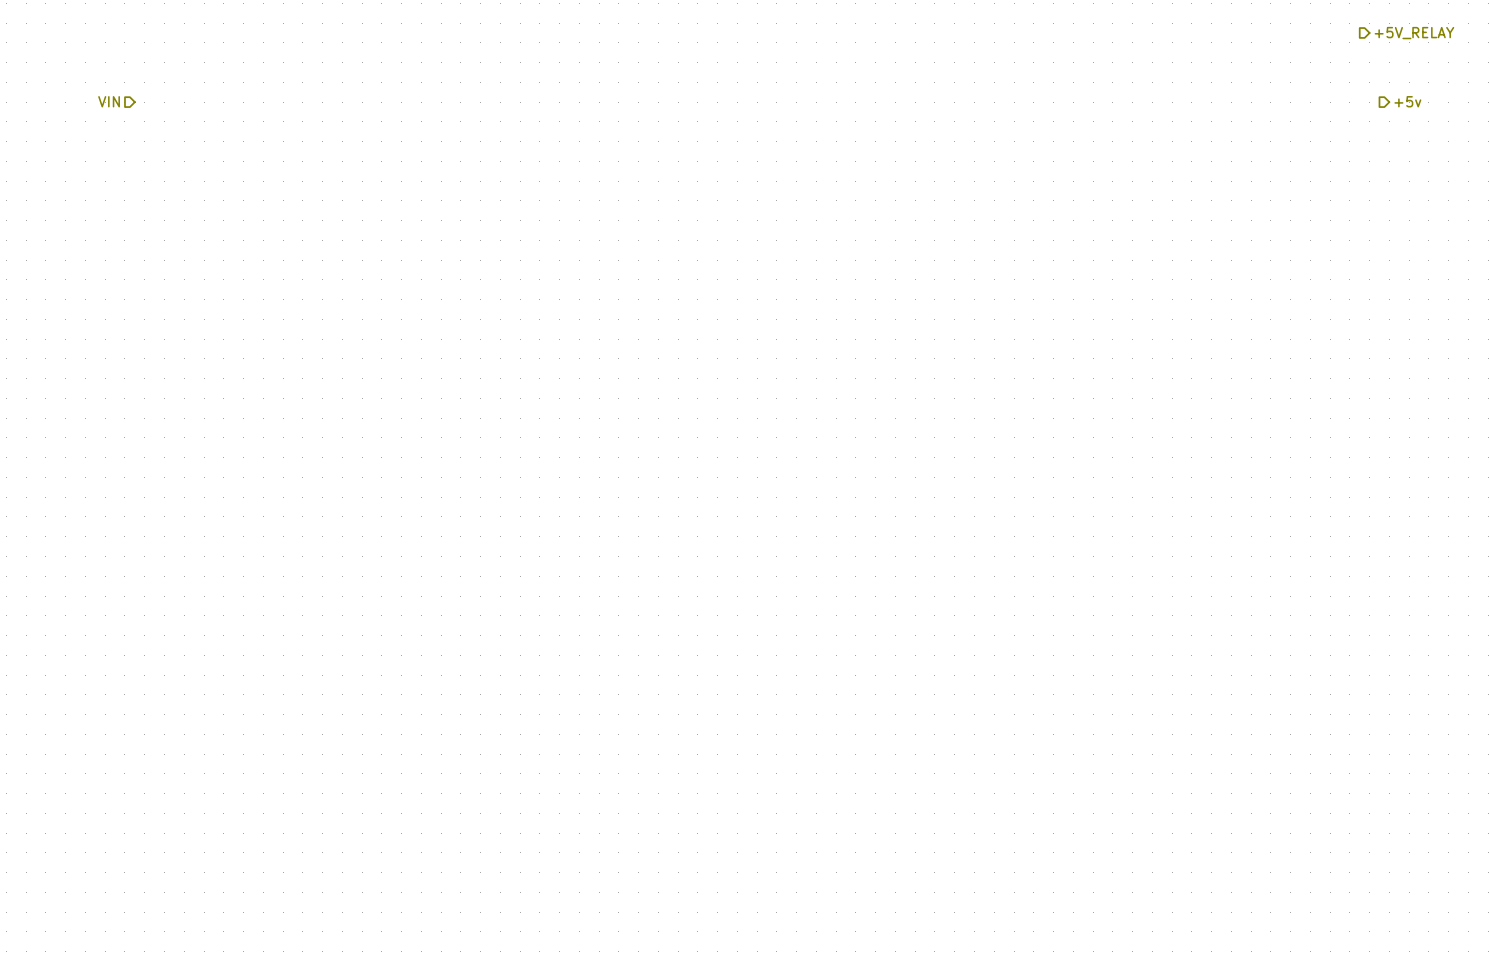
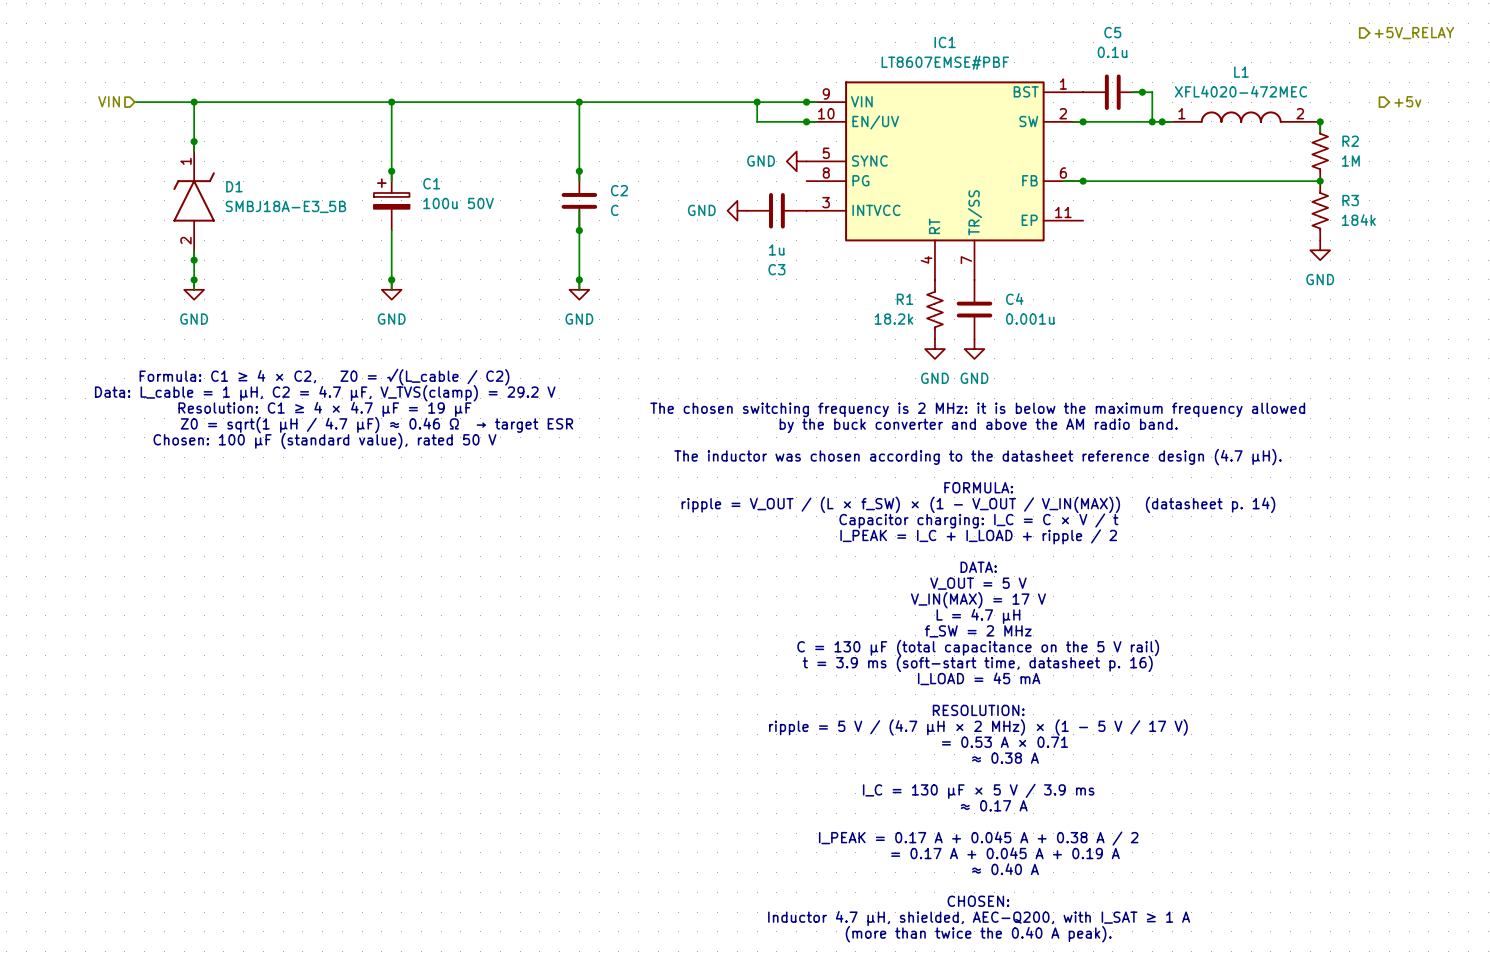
C5: none -> 0.1u (1112, 92)
wire: none -> (1132, 92) (1152, 92) (1152, 121)
junction: none -> (1142, 92)
wire: none -> (134, 102) (816, 102)
wire: none -> (194, 102) (194, 151)
junction: none -> (194, 102)
wire: none -> (391, 102) (391, 181)
junction: none -> (391, 102)
wire: none -> (579, 102) (579, 181)
junction: none -> (579, 102)
wire: none -> (757, 102) (757, 121) (816, 121)
junction: none -> (757, 102)
junction: none -> (806, 102)
L1: none -> XFL4020-472MEC (1241, 117)
junction: none -> (806, 121)
wire: none -> (1073, 121) (1172, 121)
junction: none -> (1083, 121)
junction: none -> (1152, 121)
junction: none -> (1162, 121)
wire: none -> (1320, 121) (1320, 131)
junction: none -> (1320, 121)
junction: none -> (194, 141)
R2: none -> 1M (1320, 151)
power symbol: none -> GND (796, 161)
junction: none -> (391, 171)
junction: none -> (579, 171)
IC1: none -> LT8607EMSE#PBF (944, 180)
wire: none -> (1063, 181) (1320, 181)
junction: none -> (1083, 181)
junction: none -> (1320, 181)
D1: none -> SMBJ18A-E3_5B (194, 200)
C1: none -> 100u 50V (391, 200)
C2: none -> C (579, 200)
wire: none -> (579, 210) (579, 289)
power symbol: none -> GND (737, 210)
C3: none -> 1u (776, 210)
R3: none -> 184k (1320, 210)
wire: none -> (391, 230) (391, 289)
junction: none -> (579, 230)
wire: none -> (194, 250) (194, 289)
power symbol: none -> GND (1320, 250)
junction: none -> (194, 260)
junction: none -> (194, 279)
junction: none -> (391, 279)
junction: none -> (579, 279)
power symbol: none -> GND (194, 289)
power symbol: none -> GND (391, 289)
power symbol: none -> GND (579, 289)
R1: none -> 18.2k (934, 309)
C4: none -> 0.001u (974, 309)
power symbol: none -> GND (934, 349)
power symbol: none -> GND (974, 349)
text: none -> Formula: C1 ≥ 4 × C2, Z0 = √(L_cable / C2) (324, 377)
text: none -> Data: L_cable = 1 µH, C2 = 4.7 µF, V_TVS(clamp) = 29.2 V (325, 393)
text: none -> Resolution: C1 ≥ 4 × 4.7 µF = 19 µF (324, 409)
text: none -> The chosen switching frequency is 2 MHz: it is below the maximum frequency allowed (977, 409)
text: none -> Z0 = sqrt(1 µH / 4.7 µF) ≈ 0.46 Ω → target ESR (376, 425)
text: none -> by the buck converter and above the AM radio band. (978, 425)
text: none -> Chosen: 100 µF (standard value), rated 50 V (324, 440)
text: none -> The inductor was chosen according to the datasheet reference design (4.7 µH). (977, 457)
text: none -> FORMULA: (978, 487)
text: none -> ripple = V_OUT / (L × f_SW) × (1 − V_OUT / V_IN(MAX)) (datasheet p. 14) (978, 504)
text: none -> Capacitor charging: I_C = C × V / t (978, 520)
text: none -> I_PEAK = I_C + I_LOAD + ripple / 2 (978, 536)
text: none -> DATA: (978, 567)
text: none -> V_OUT = 5 V (978, 583)
text: none -> V_IN(MAX) = 17 V (978, 600)
text: none -> L = 4.7 µH (978, 616)
text: none -> f_SW = 2 MHz (978, 631)
text: none -> C = 130 µF (total capacitance on the 5 V rail) (978, 647)
text: none -> t = 3.9 ms (soft-start time, datasheet p. 16) (977, 663)
text: none -> I_LOAD = 45 mA (979, 678)
text: none -> RESOLUTION: (978, 710)
text: none -> ripple = 5 V / (4.7 µH × 2 MHz) × (1 − 5 V / 17 V) (978, 727)
text: none -> = 0.53 A × 0.71 (1005, 742)
text: none -> ≈ 0.38 A (1005, 758)
text: none -> I_C = 130 µF × 5 V / 3.9 ms (978, 791)
text: none -> ≈ 0.17 A (994, 805)
text: none -> I_PEAK = 0.17 A + 0.045 A + 0.38 A / 2 (978, 838)
text: none -> = 0.17 A + 0.045 A + 0.19 A (1005, 853)
text: none -> ≈ 0.40 A (1005, 869)
text: none -> CHOSEN: (978, 901)
text: none -> Inductor 4.7 µH, shielded, AEC-Q200, with I_SAT ≥ 1 A (979, 918)
text: none -> (more than twice the 0.40 A peak). (978, 934)

